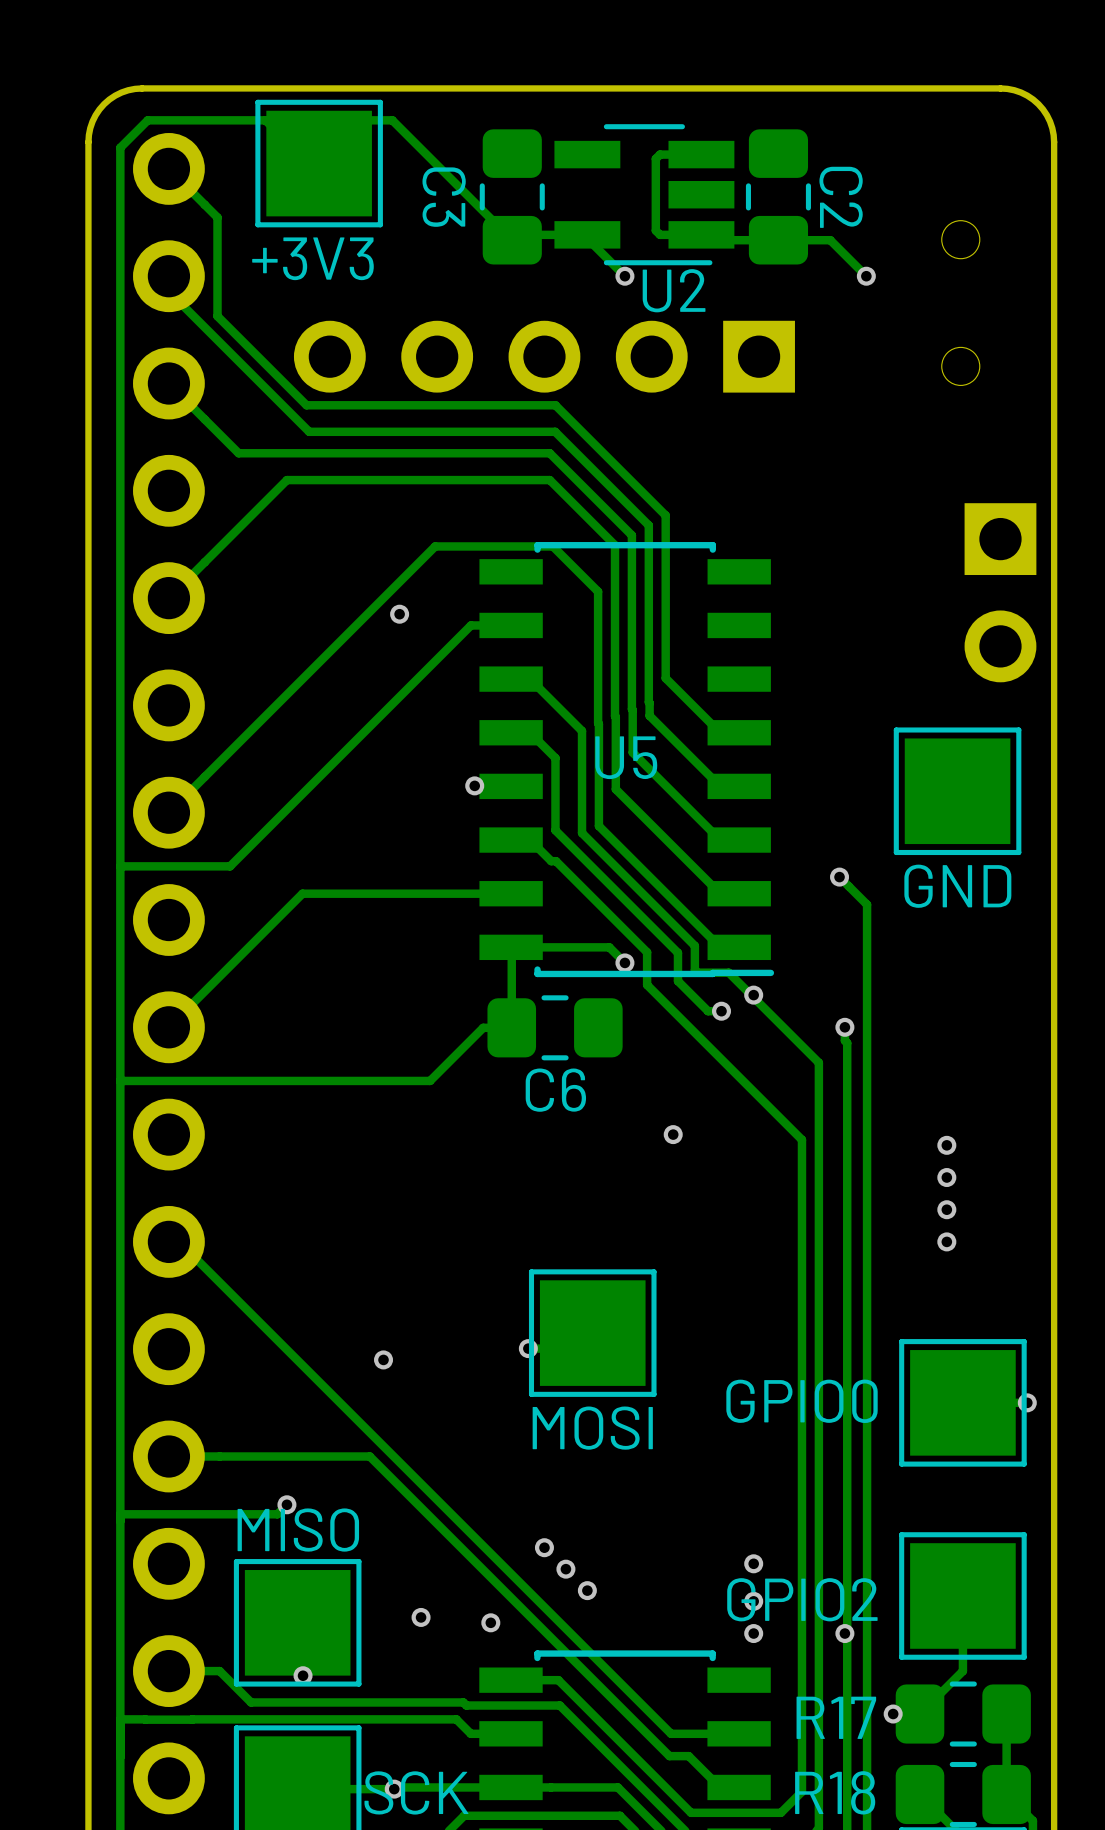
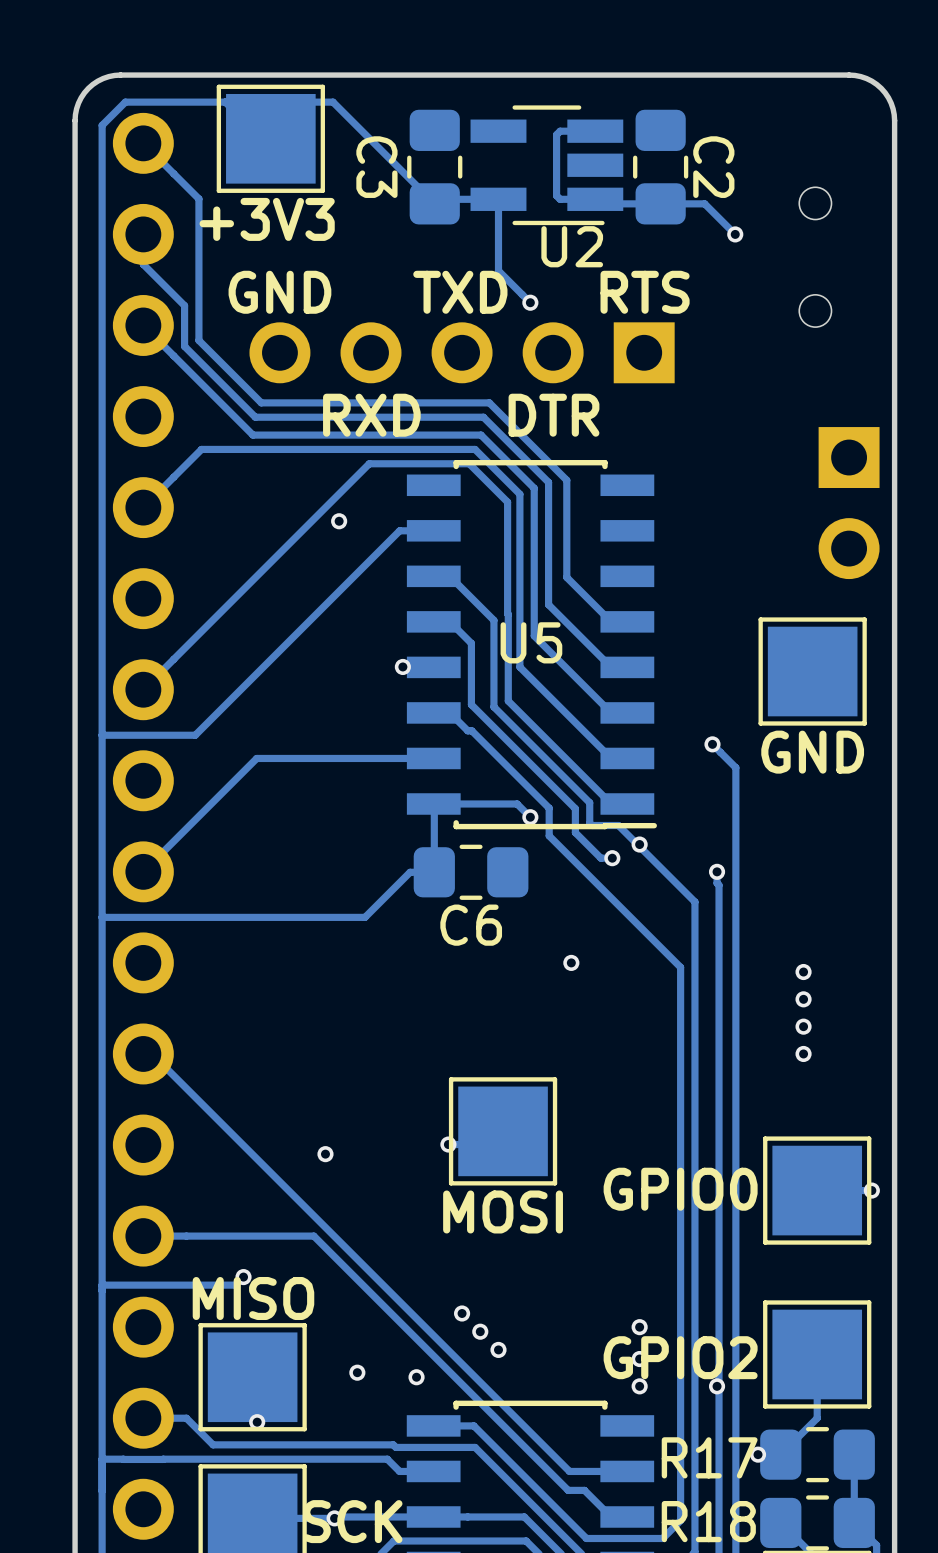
track: (217, 217) (217, 316) (306, 405) (555, 405) (665, 515) (665, 678) (667, 680) -> (184, 184) (198, 198) (198, 340) (261, 402) (489, 402) (566, 480) (566, 577)
track: (587, 238) (624, 276) -> (498, 202) (498, 270) (530, 302)
via position: (624, 276) -> (530, 302)
track: (168, 291) (309, 431) (555, 431) (648, 525) (649, 715) -> (143, 247) (143, 264) (184, 305) (184, 346) (255, 417) (483, 417) (548, 482) (548, 604) (551, 607)
text: none -> GND (279, 292)
text: none -> TXD (460, 292)
text: none -> RTS (645, 292)
part position: (544, 356) -> (462, 352)
track: (238, 453) (549, 453) (631, 535) (632, 752) -> (202, 384) (252, 435) (481, 435) (534, 488) (534, 635) (536, 638)
text: none -> RXD (371, 415)
text: none -> DTR (553, 415)
track: (237, 529) (286, 480) (549, 480) (615, 545) (615, 789) -> (201, 449) (475, 449) (519, 494) (519, 667) (522, 669)

